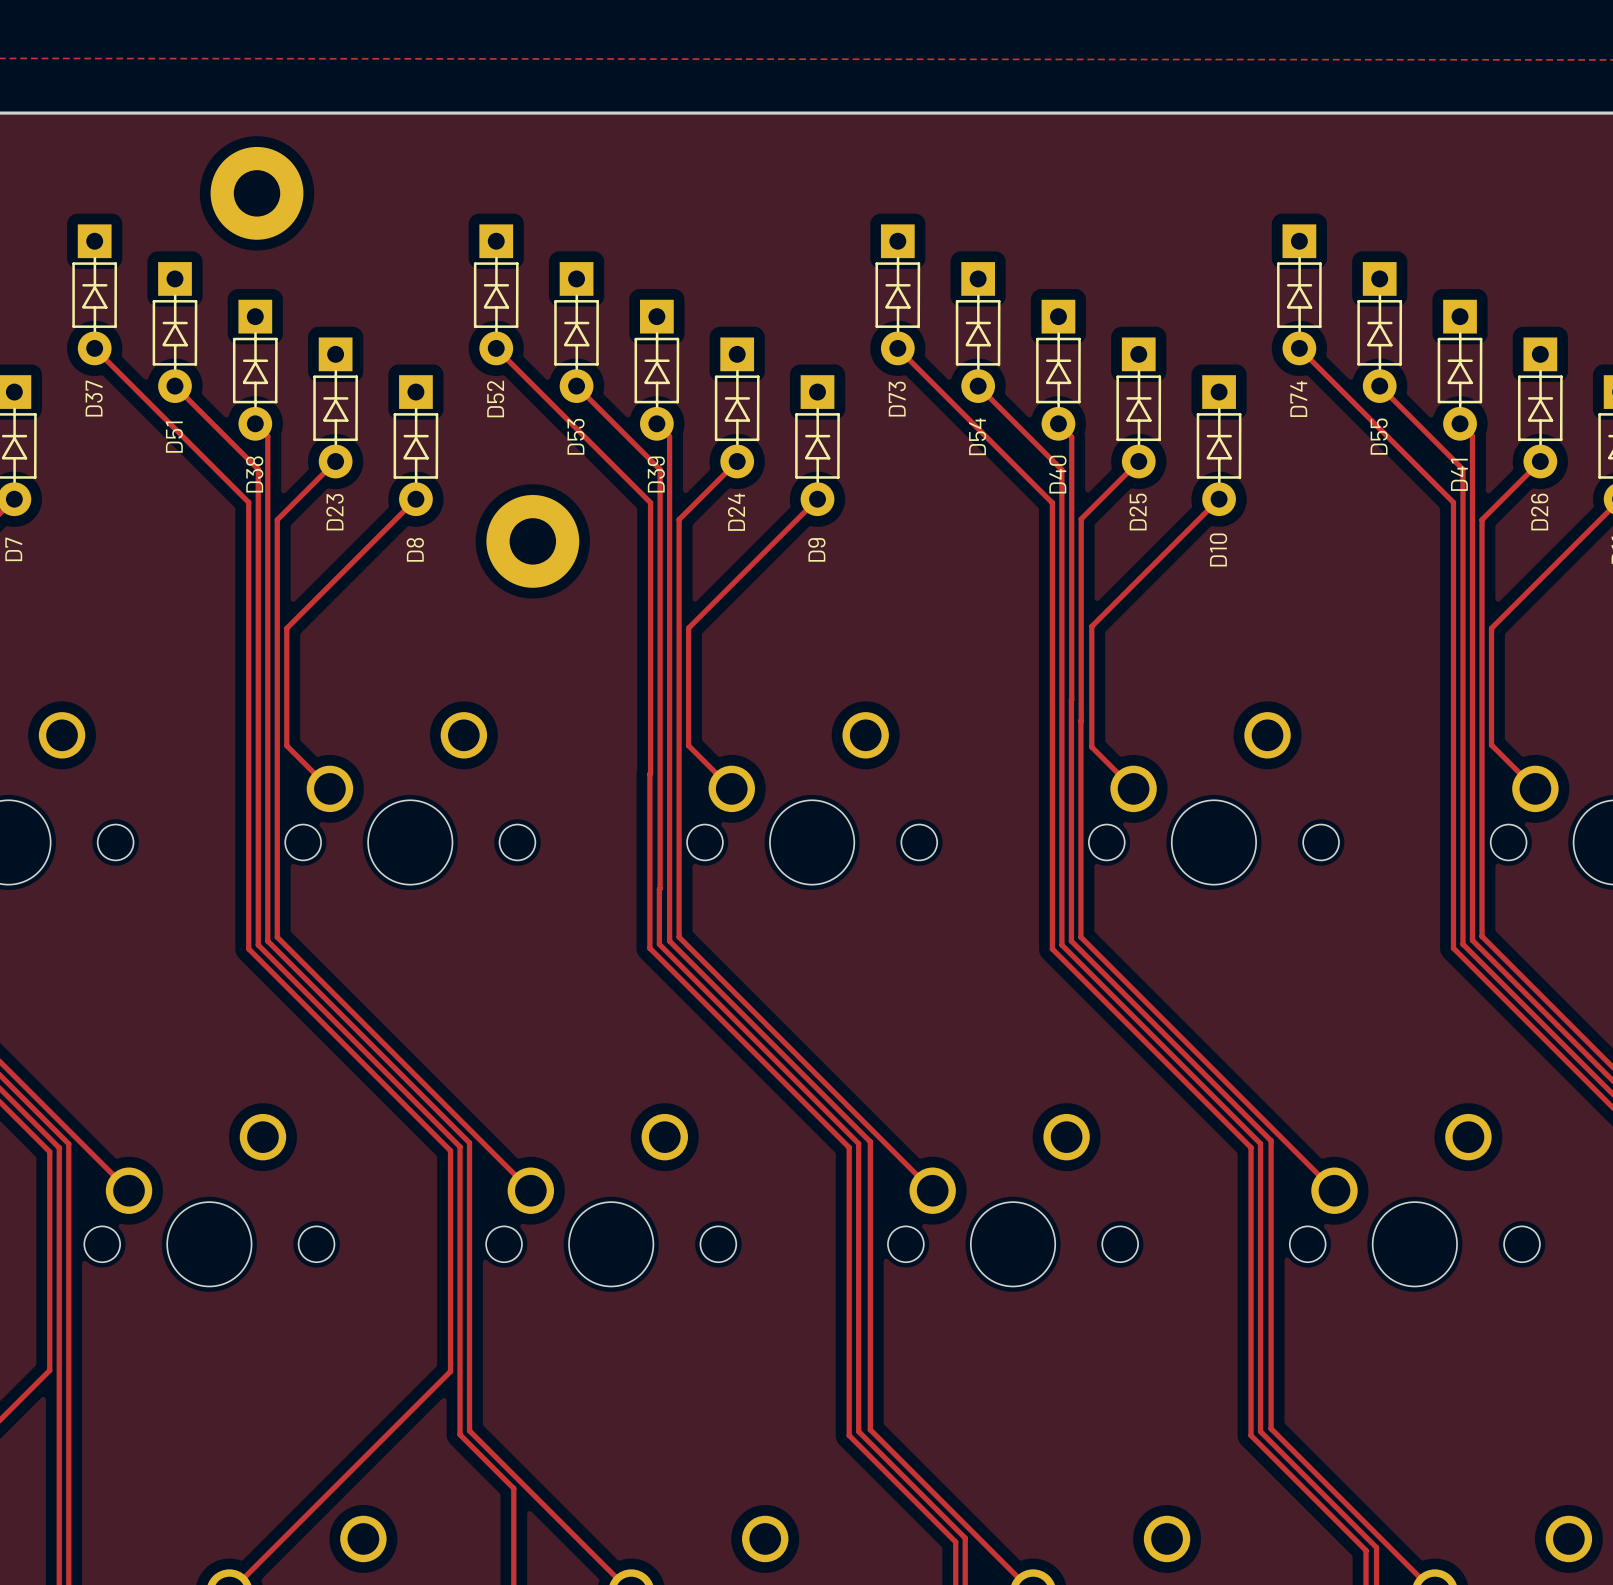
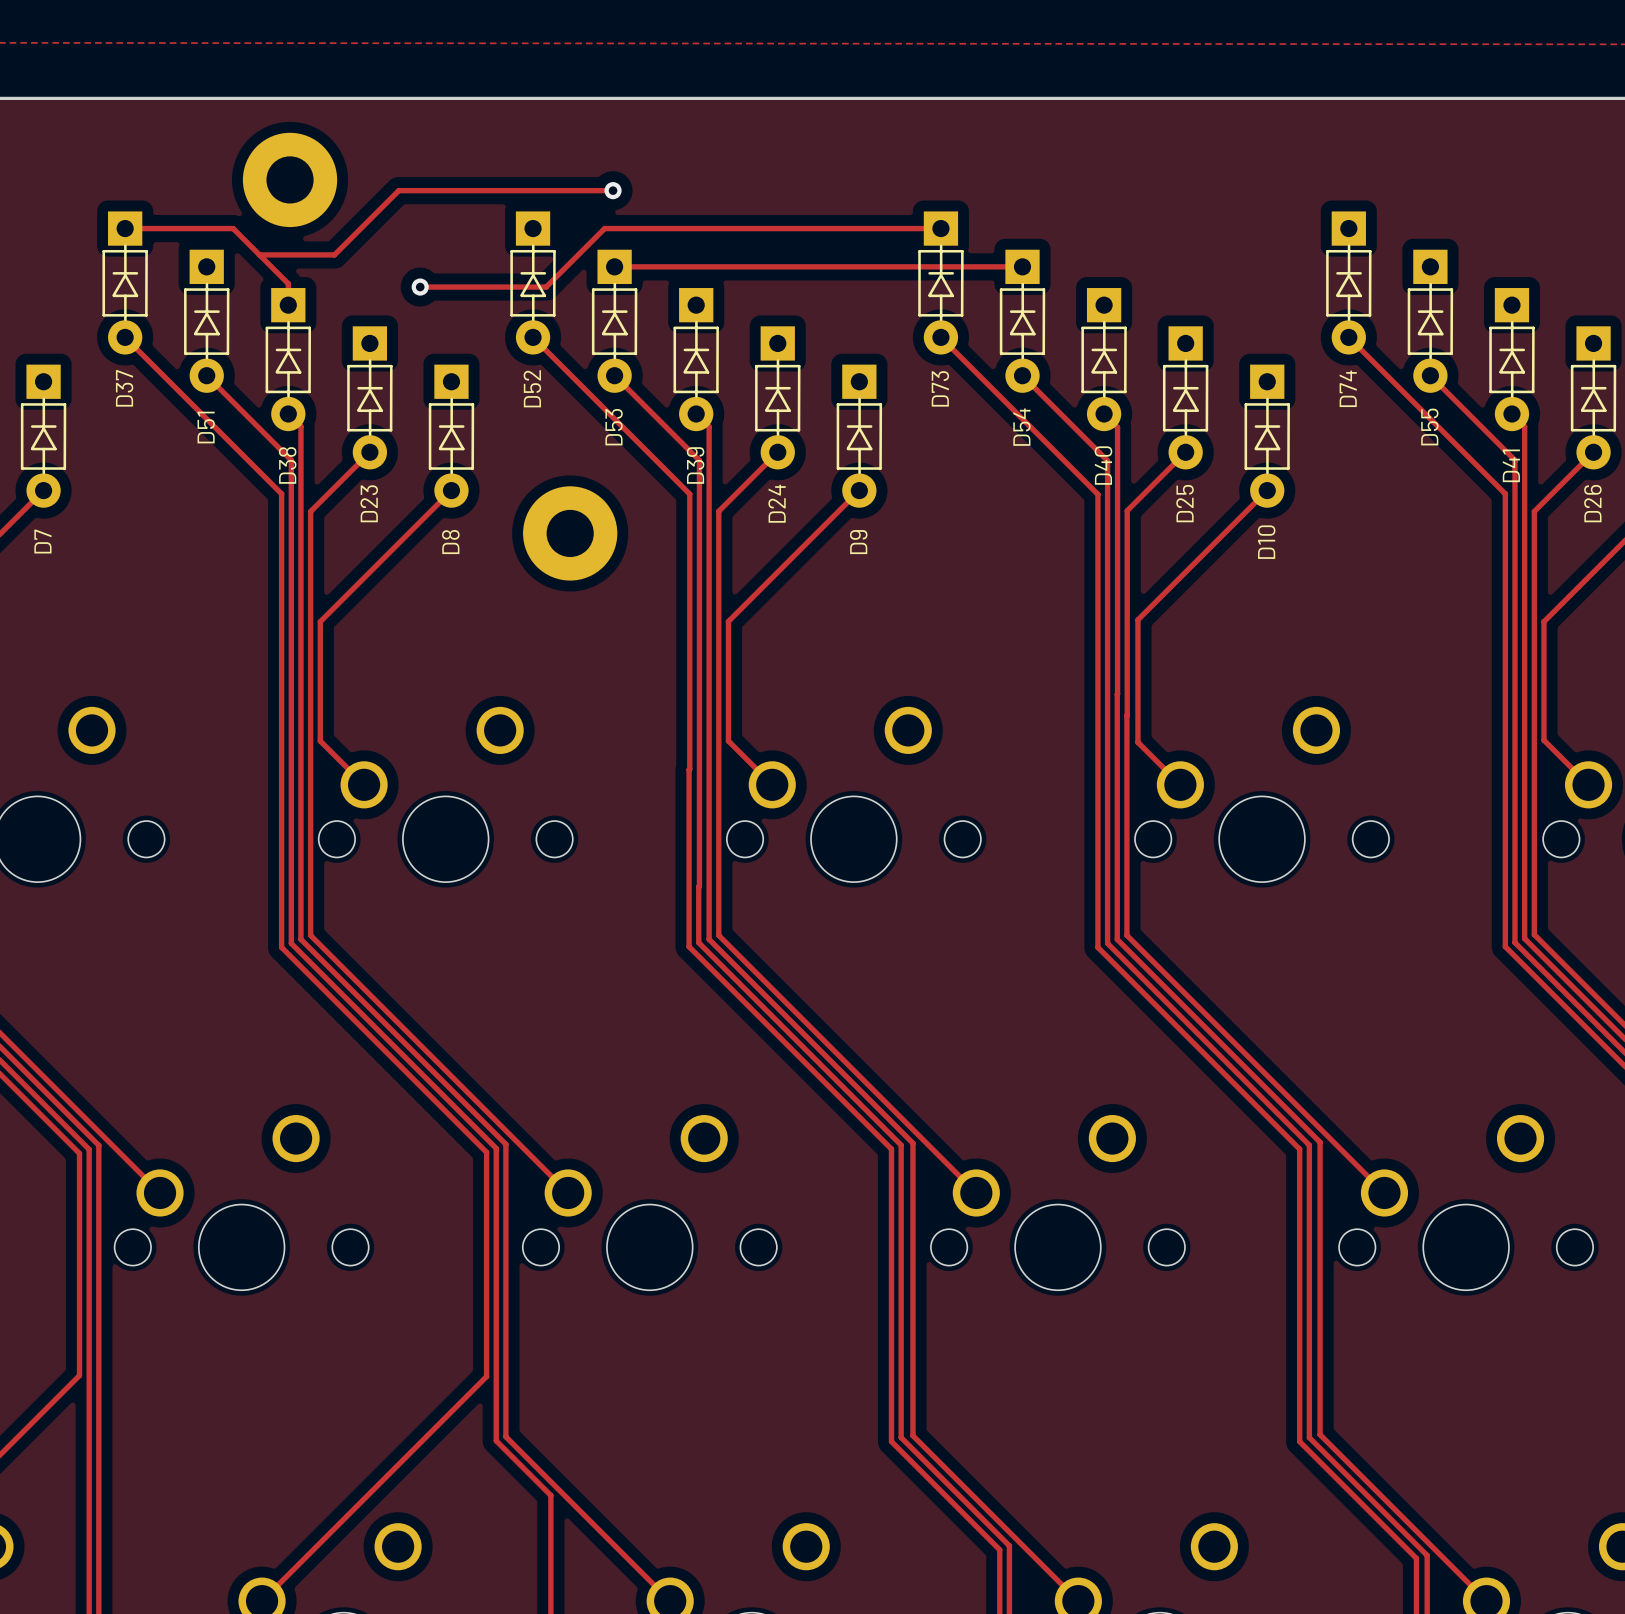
track: none -> (613, 190) (398, 190) (334, 254) (259, 254)
via: none -> (613, 190)
track: none -> (125, 228) (233, 228) (288, 283) (288, 305)
track: none -> (940, 228) (604, 228) (546, 287) (420, 287)
track: none -> (614, 266) (1022, 266)
via: none -> (420, 287)

